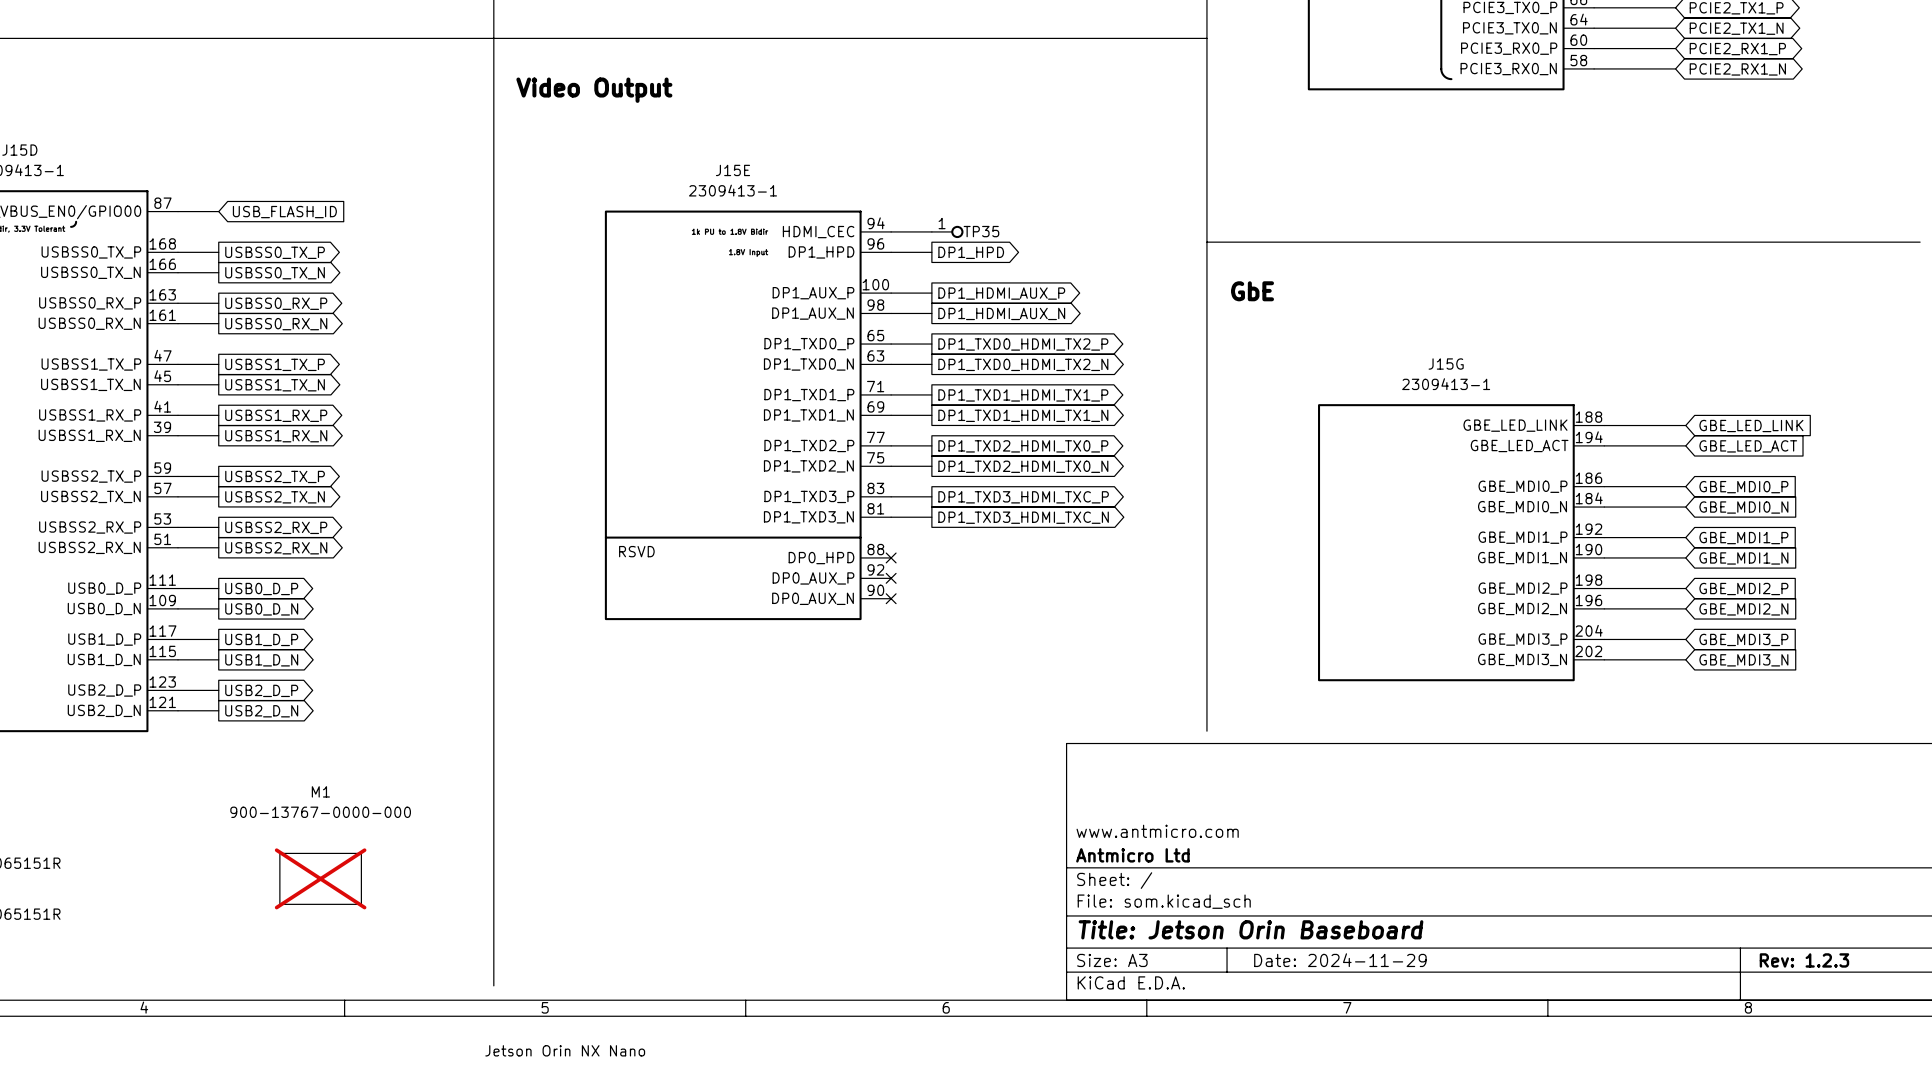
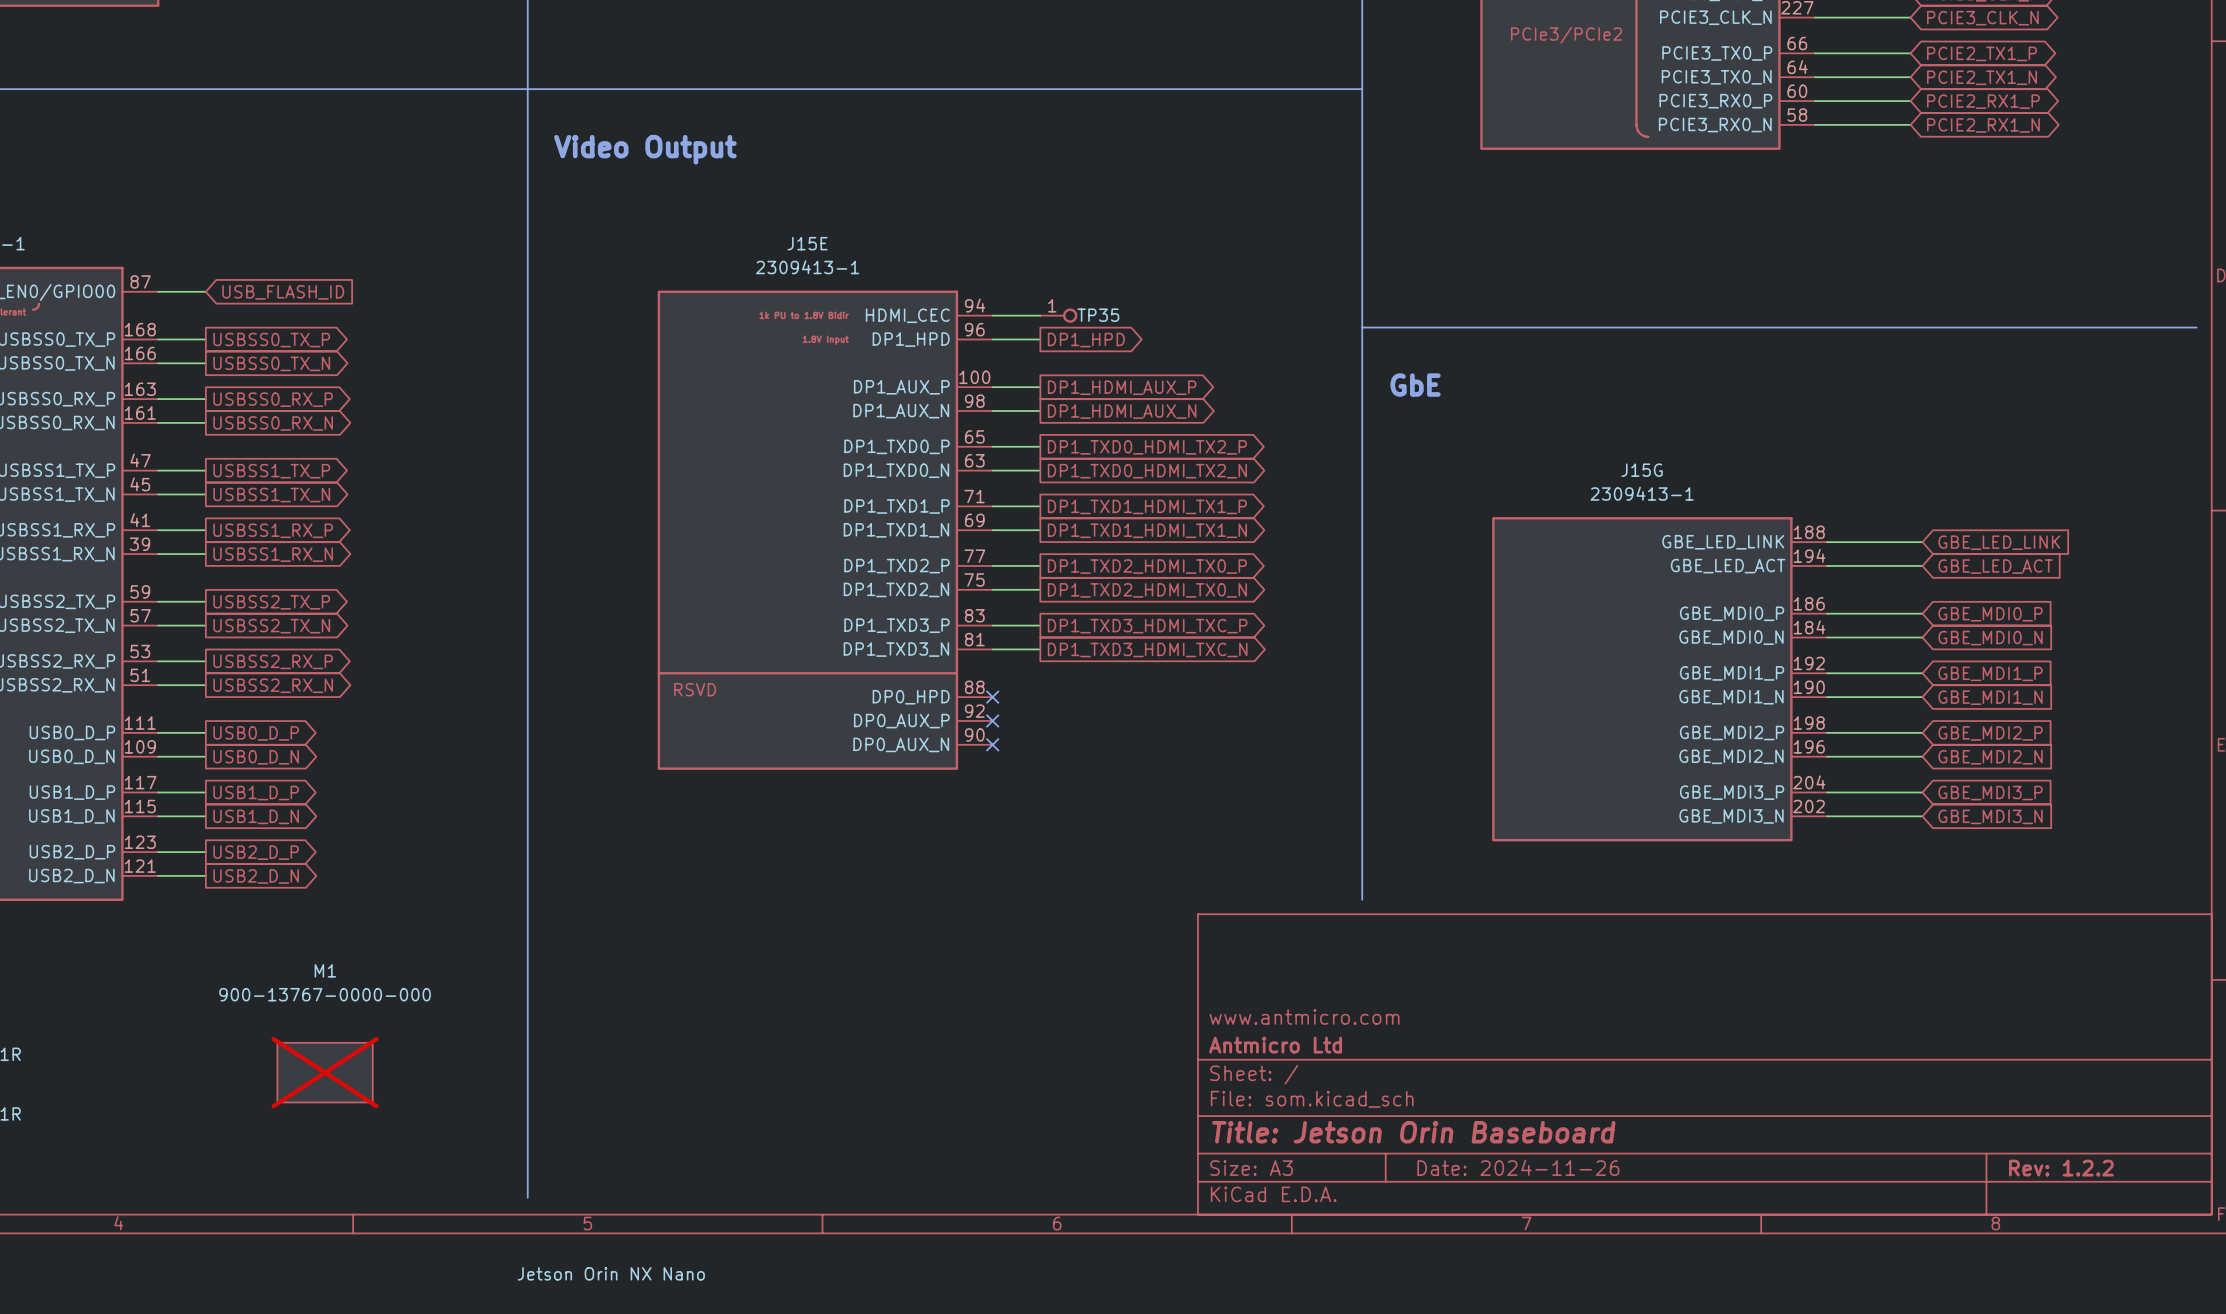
title block: Date: 2024-11-29 (1340, 960) -> Date: 2024-11-26 (1518, 1167)
title block: Rev: 1.2.3 (1804, 960) -> Rev: 1.2.2 (2061, 1168)

